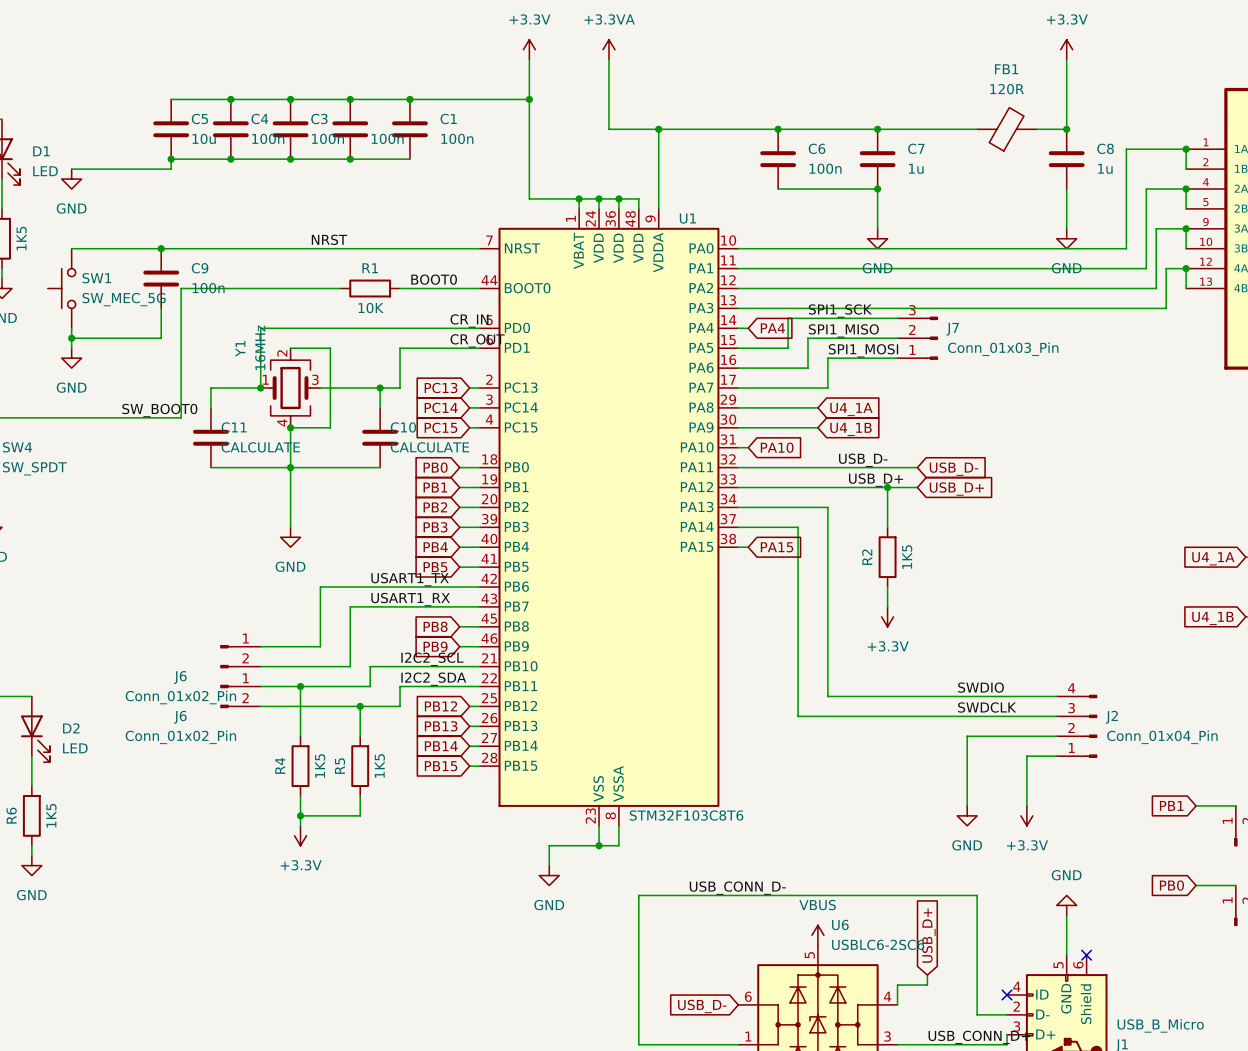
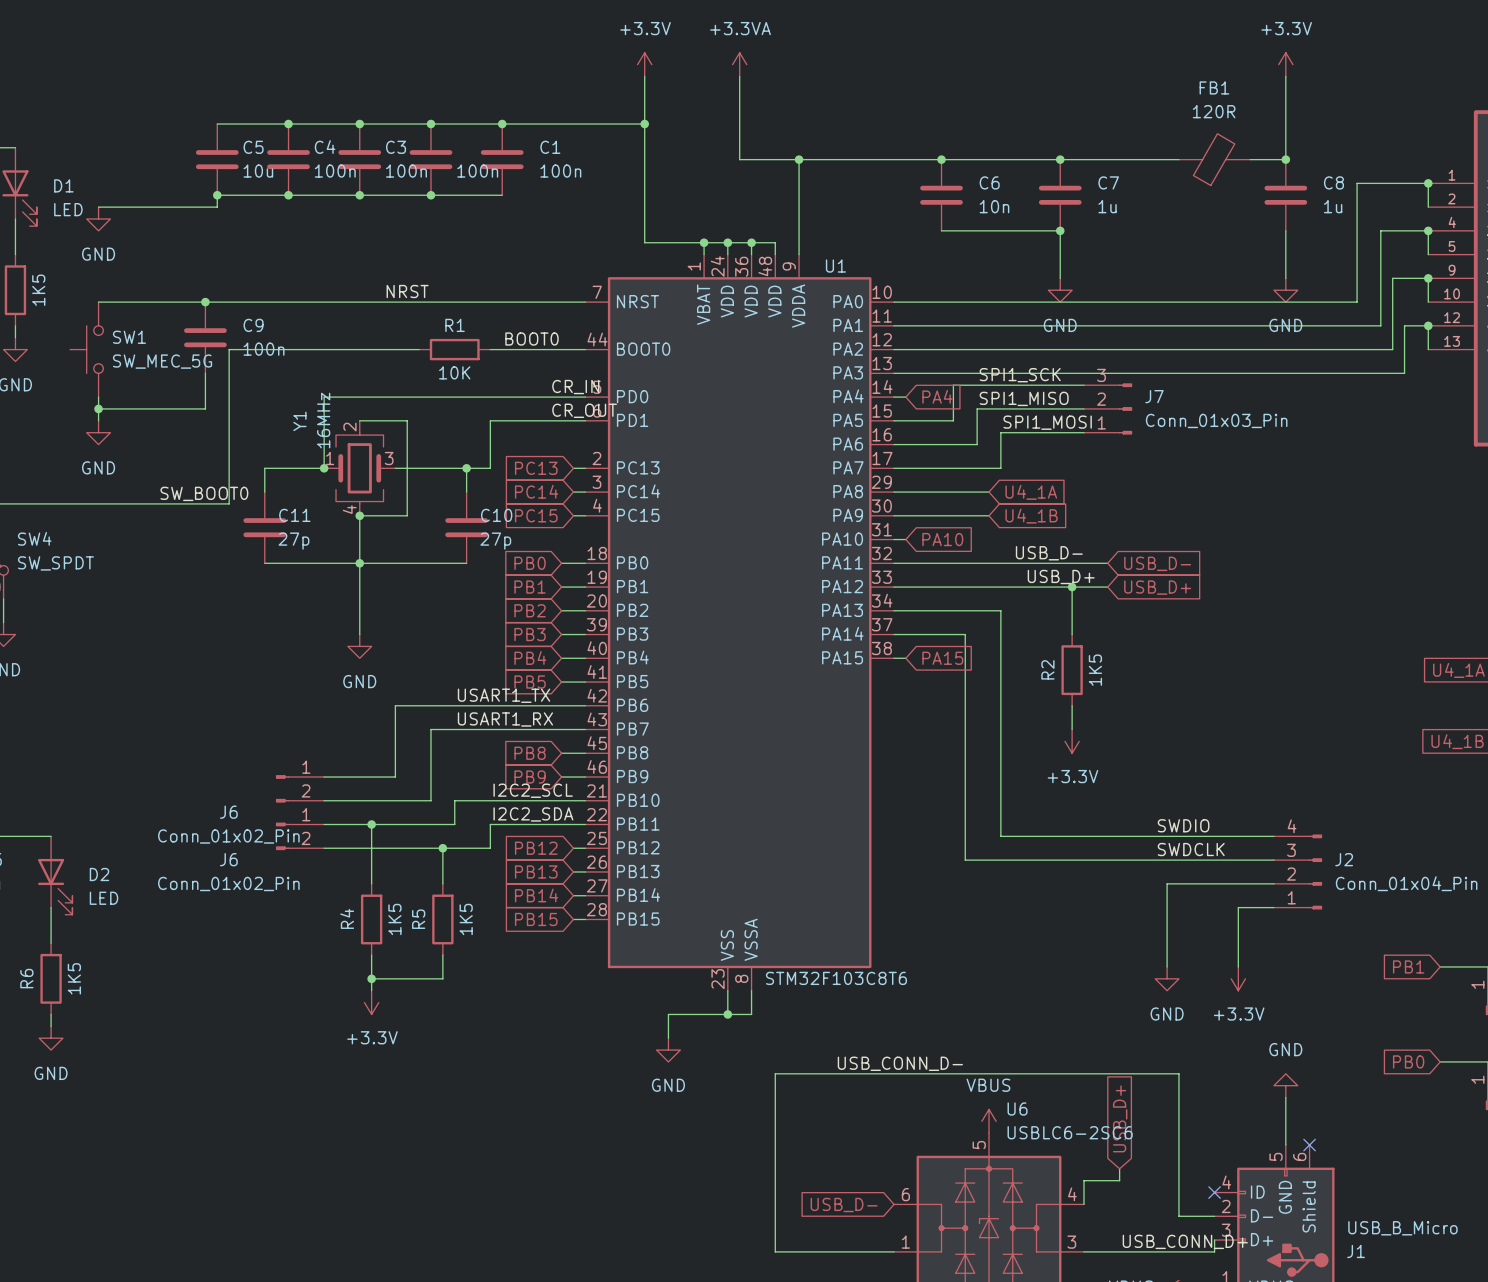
C6 value: 100n (825, 168) -> 10n (994, 206)
C11 value: CALCULATE (260, 447) -> 27p (293, 541)
C10 value: CALCULATE (429, 447) -> 27p (495, 541)

